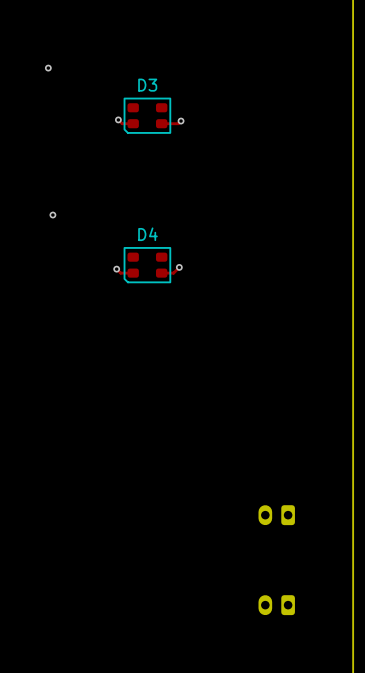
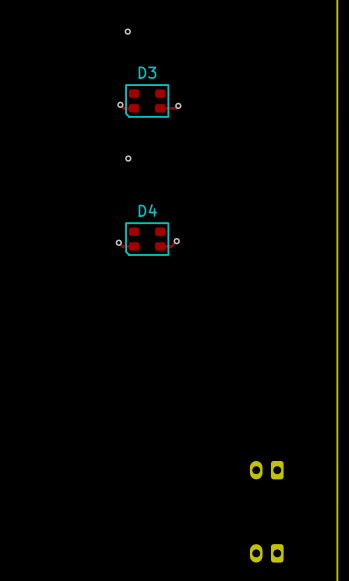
via: none -> (127, 31)
via: (48, 68) -> none
via: none -> (128, 158)
via: (52, 215) -> none

